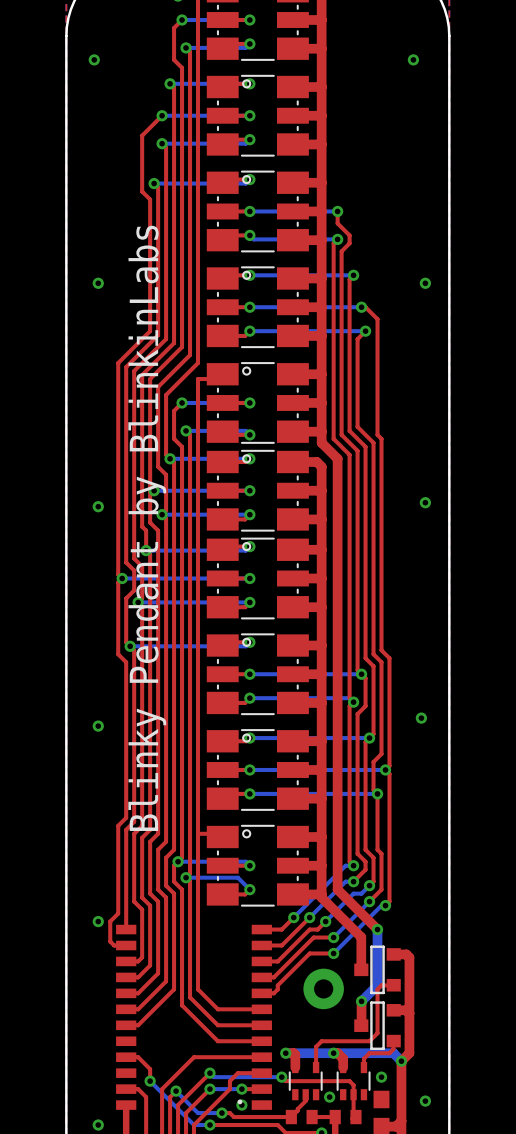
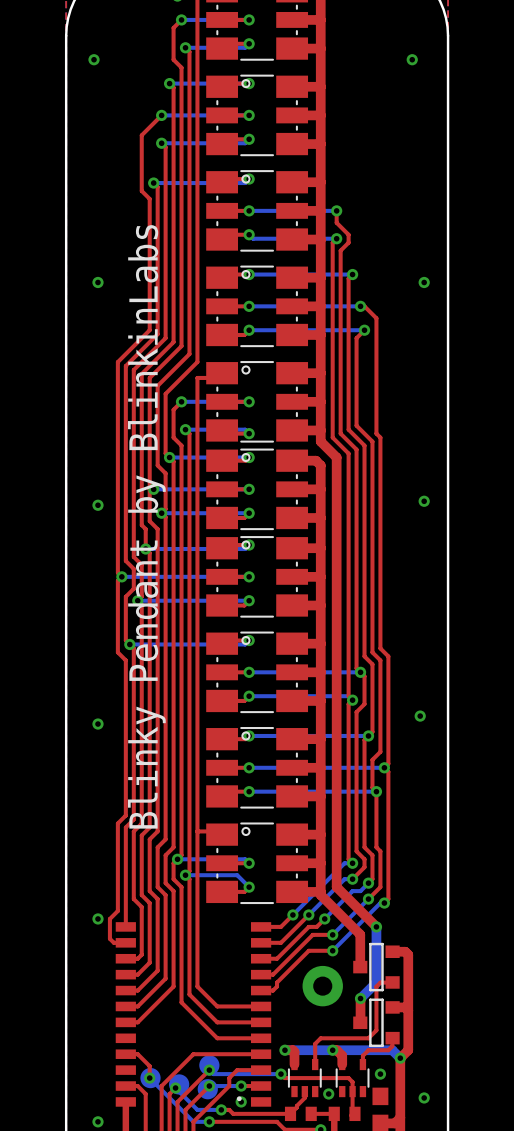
part: none -> (209, 1065)
part: none -> (150, 1078)
part: none -> (179, 1084)
part: none -> (207, 1089)

